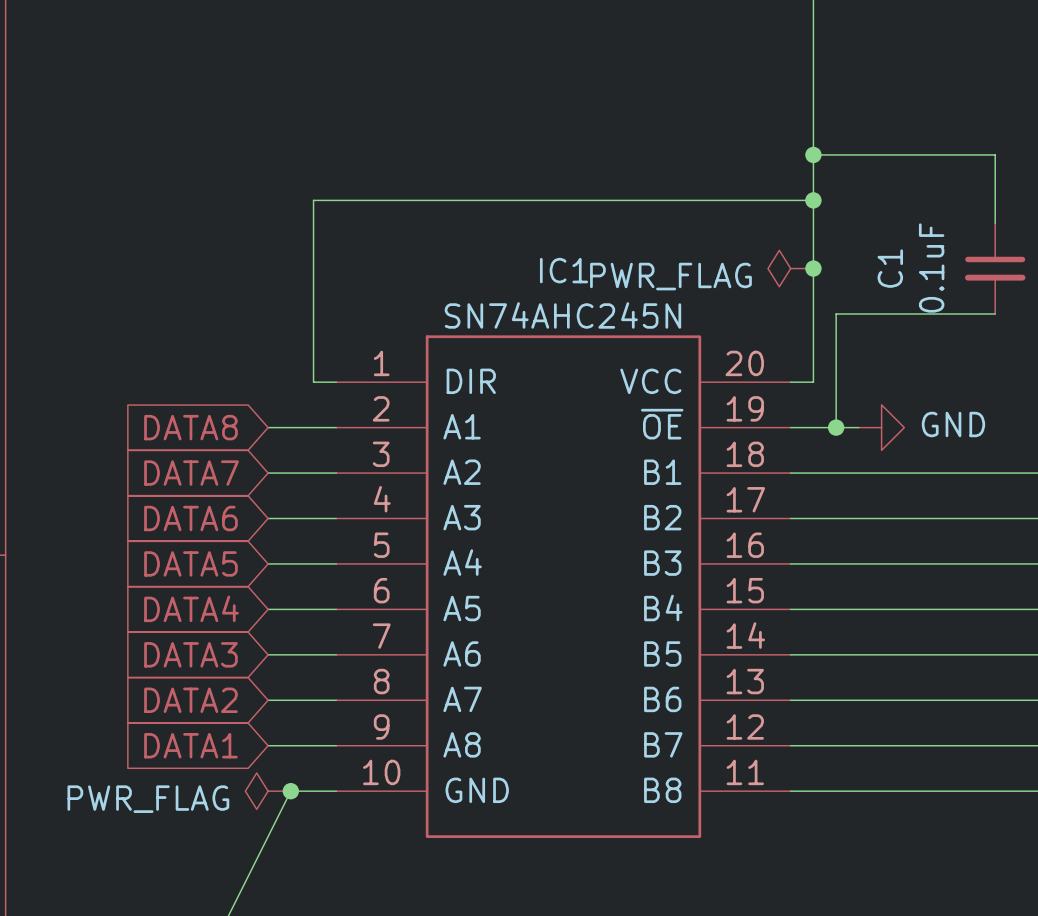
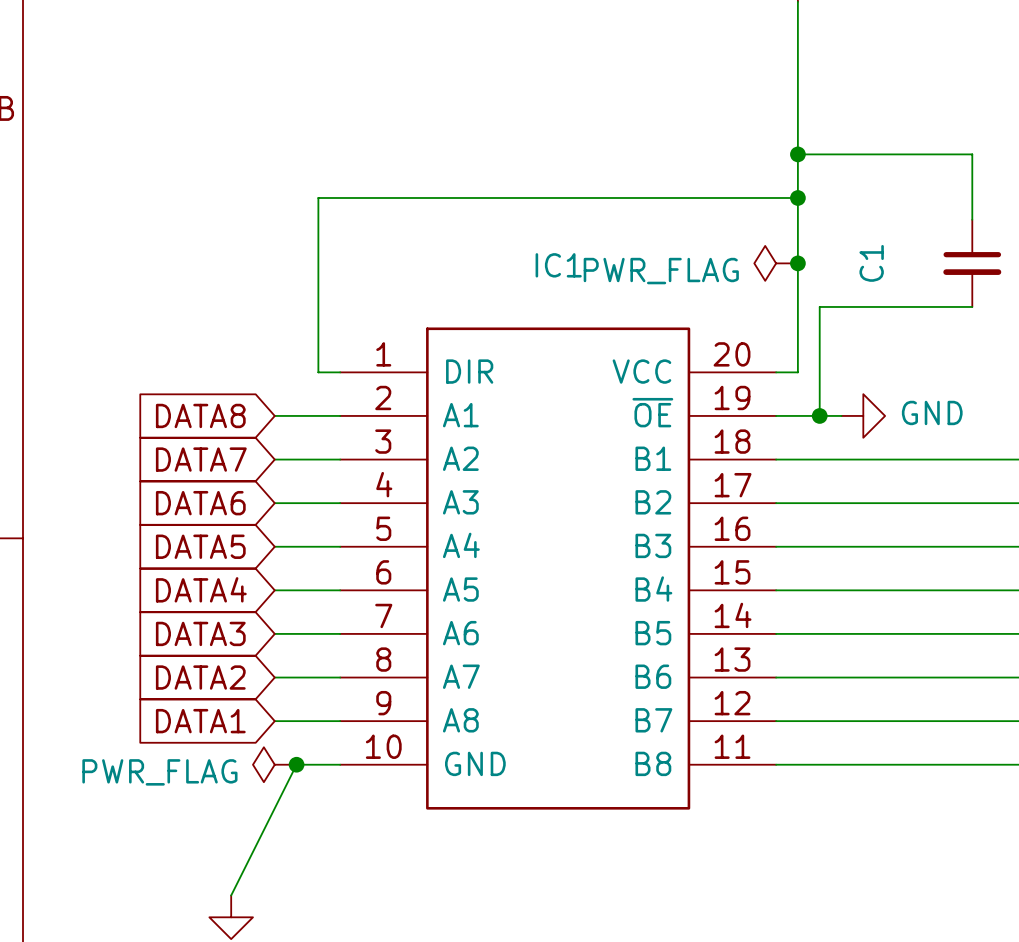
C1 value: 0.1uF (931, 268) -> none
IC1 value: SN74AHC245N (562, 315) -> none

